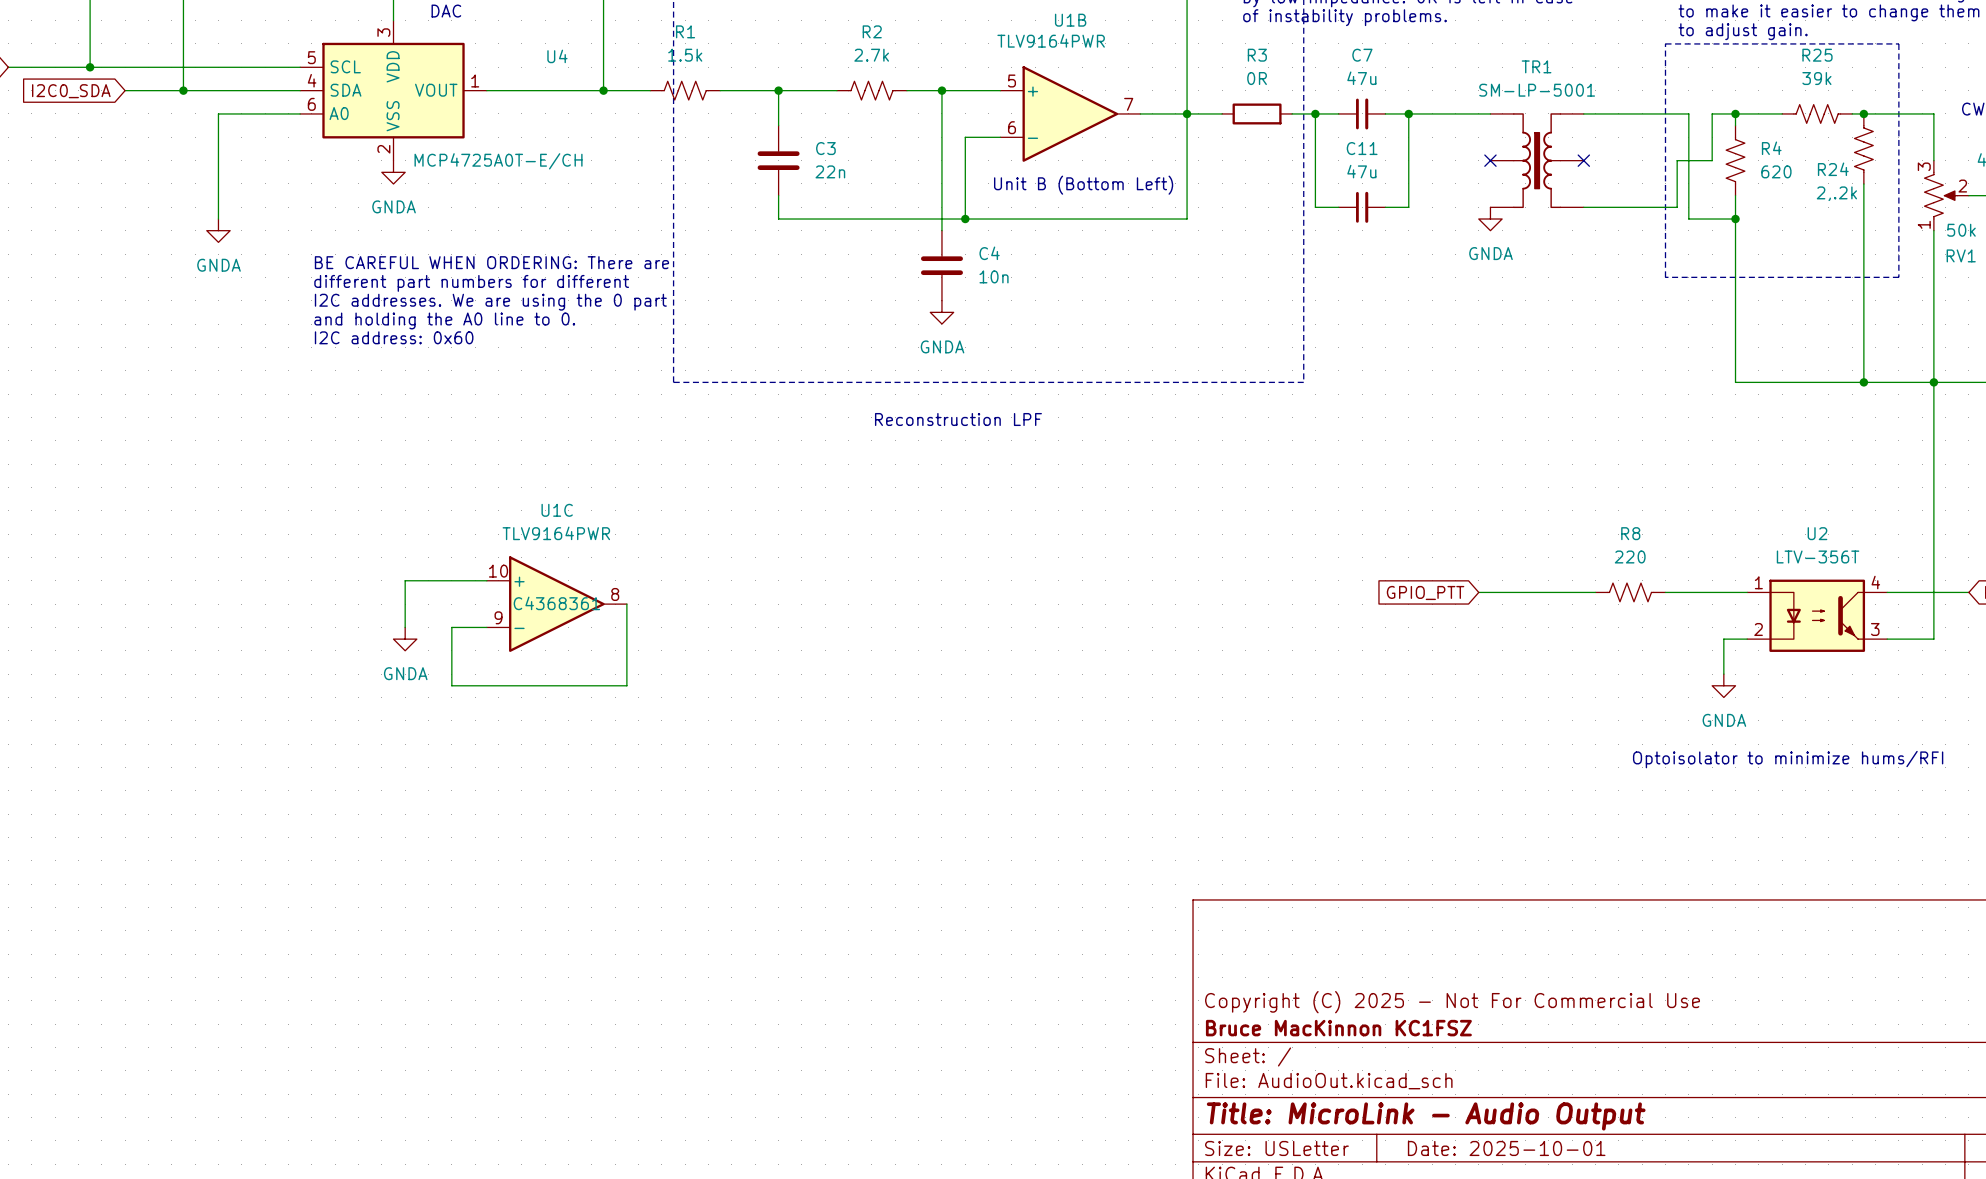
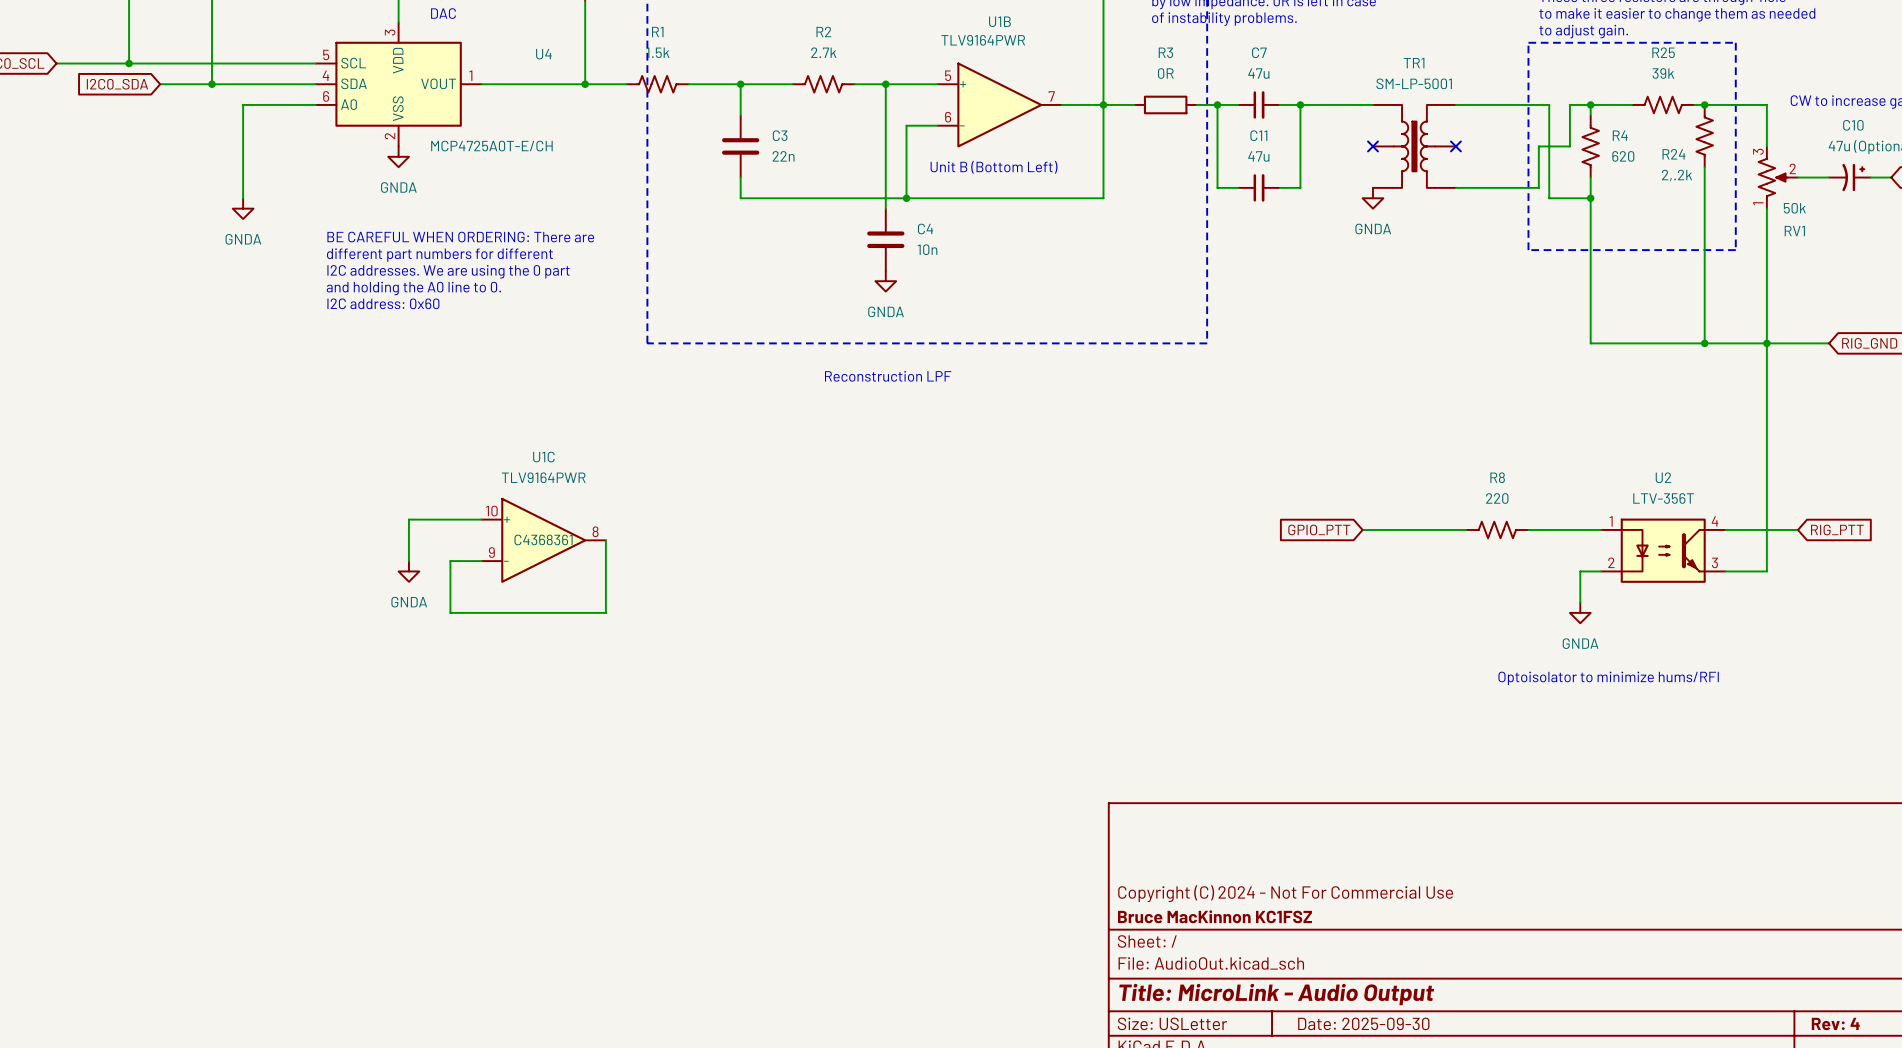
title block: Copyright (C) 2025 - Not For Commercial Use (1452, 1002) -> Copyright (C) 2024 - Not For Commercial Use (1285, 893)
title block: Date: 2025-10-01 (1506, 1148) -> Date: 2025-09-30 (1363, 1023)

